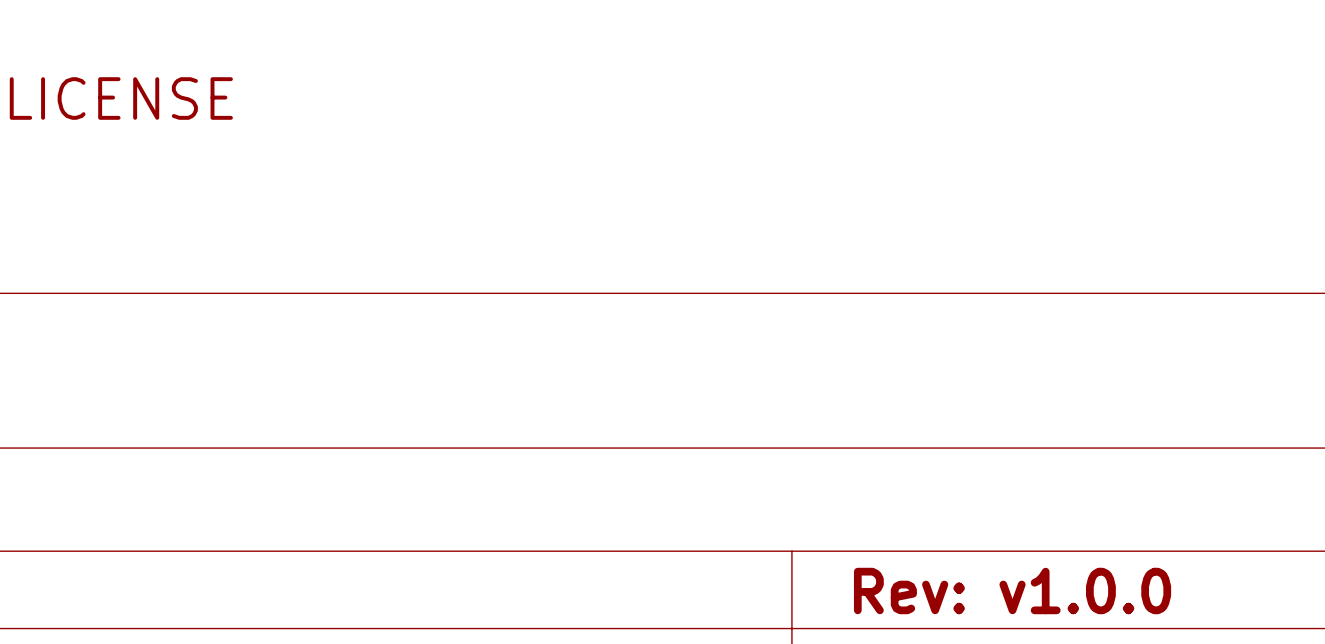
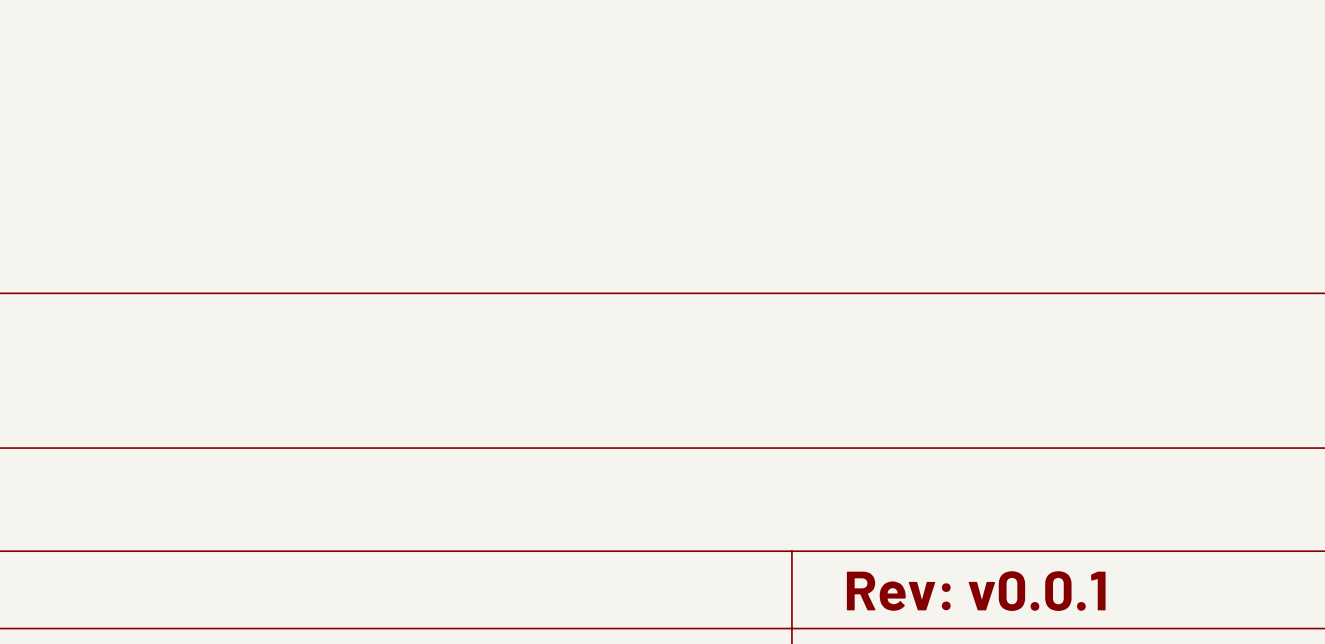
title block: Rev: v1.0.0 (1012, 591) -> Rev: v0.0.1 (976, 591)

